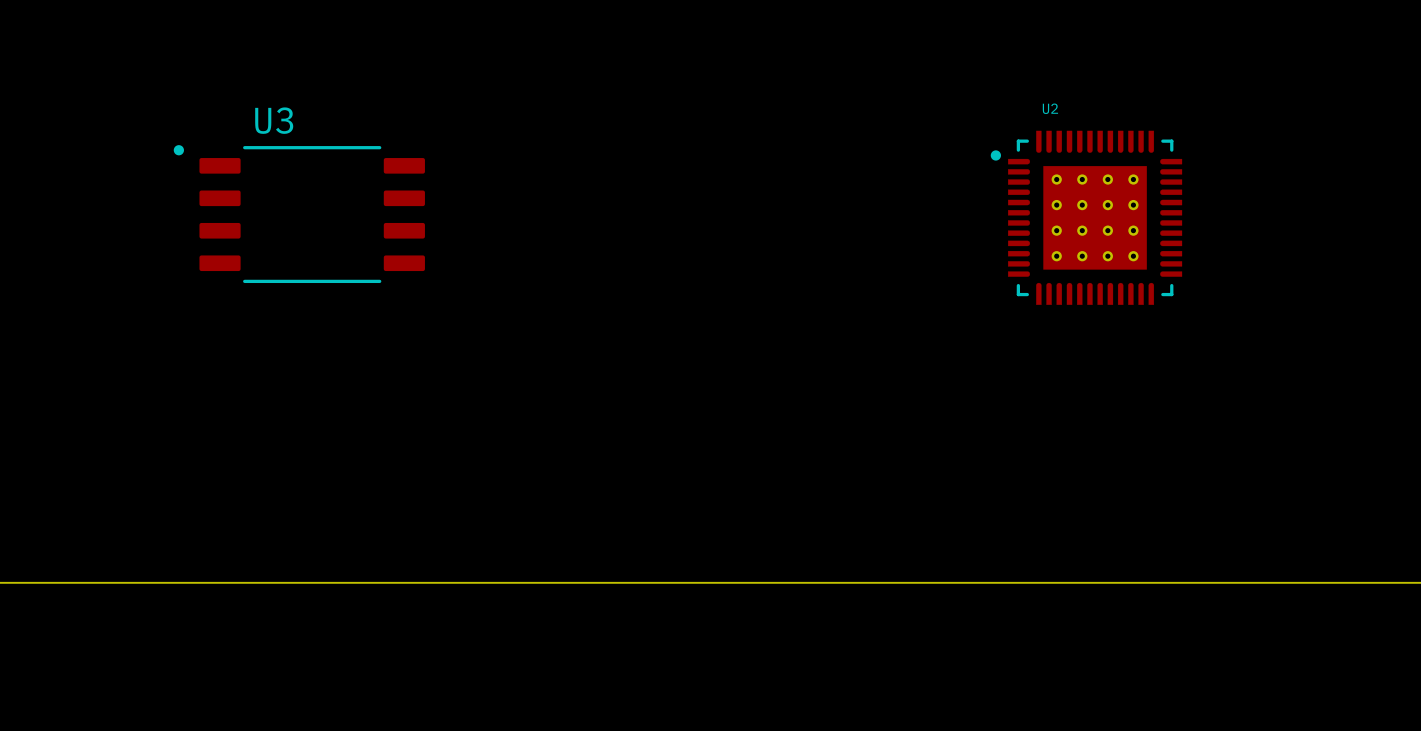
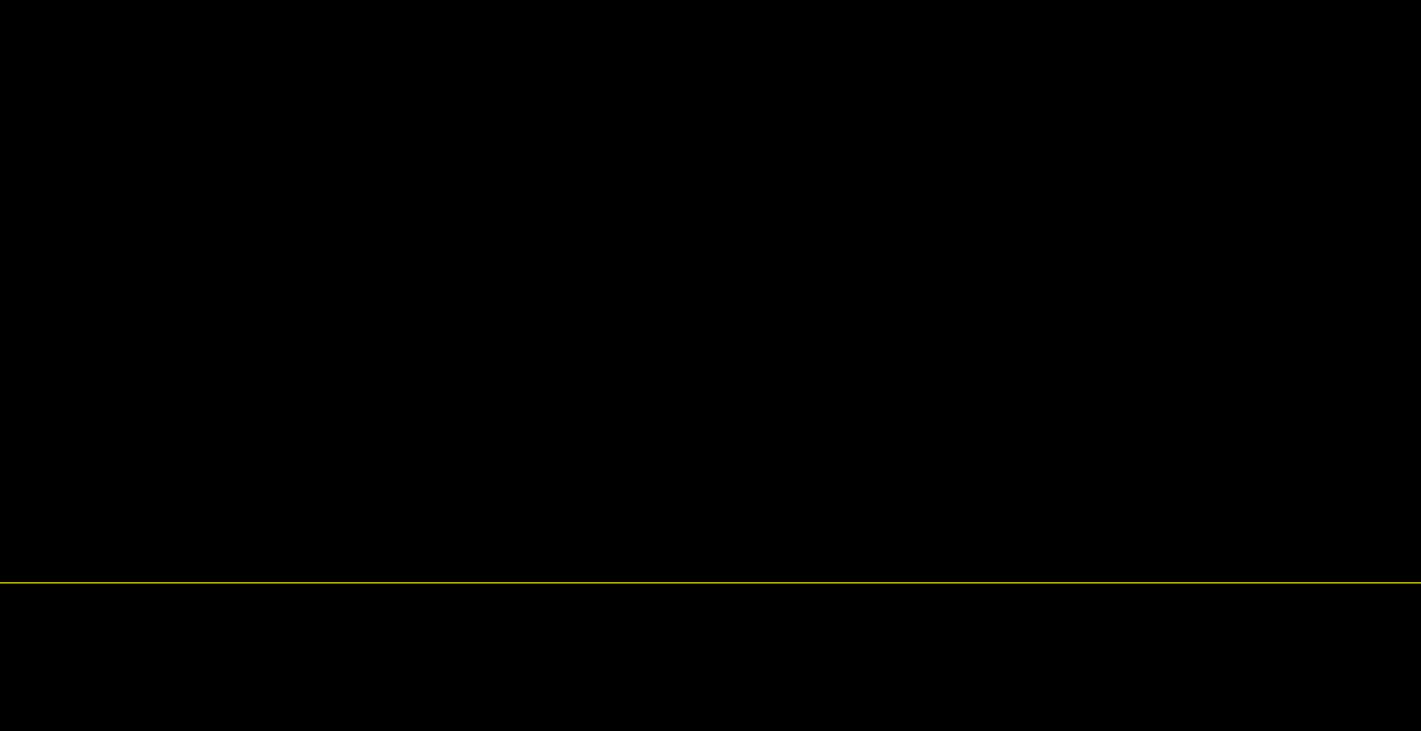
U3: (299, 214) -> none
U2: (1086, 217) -> none

